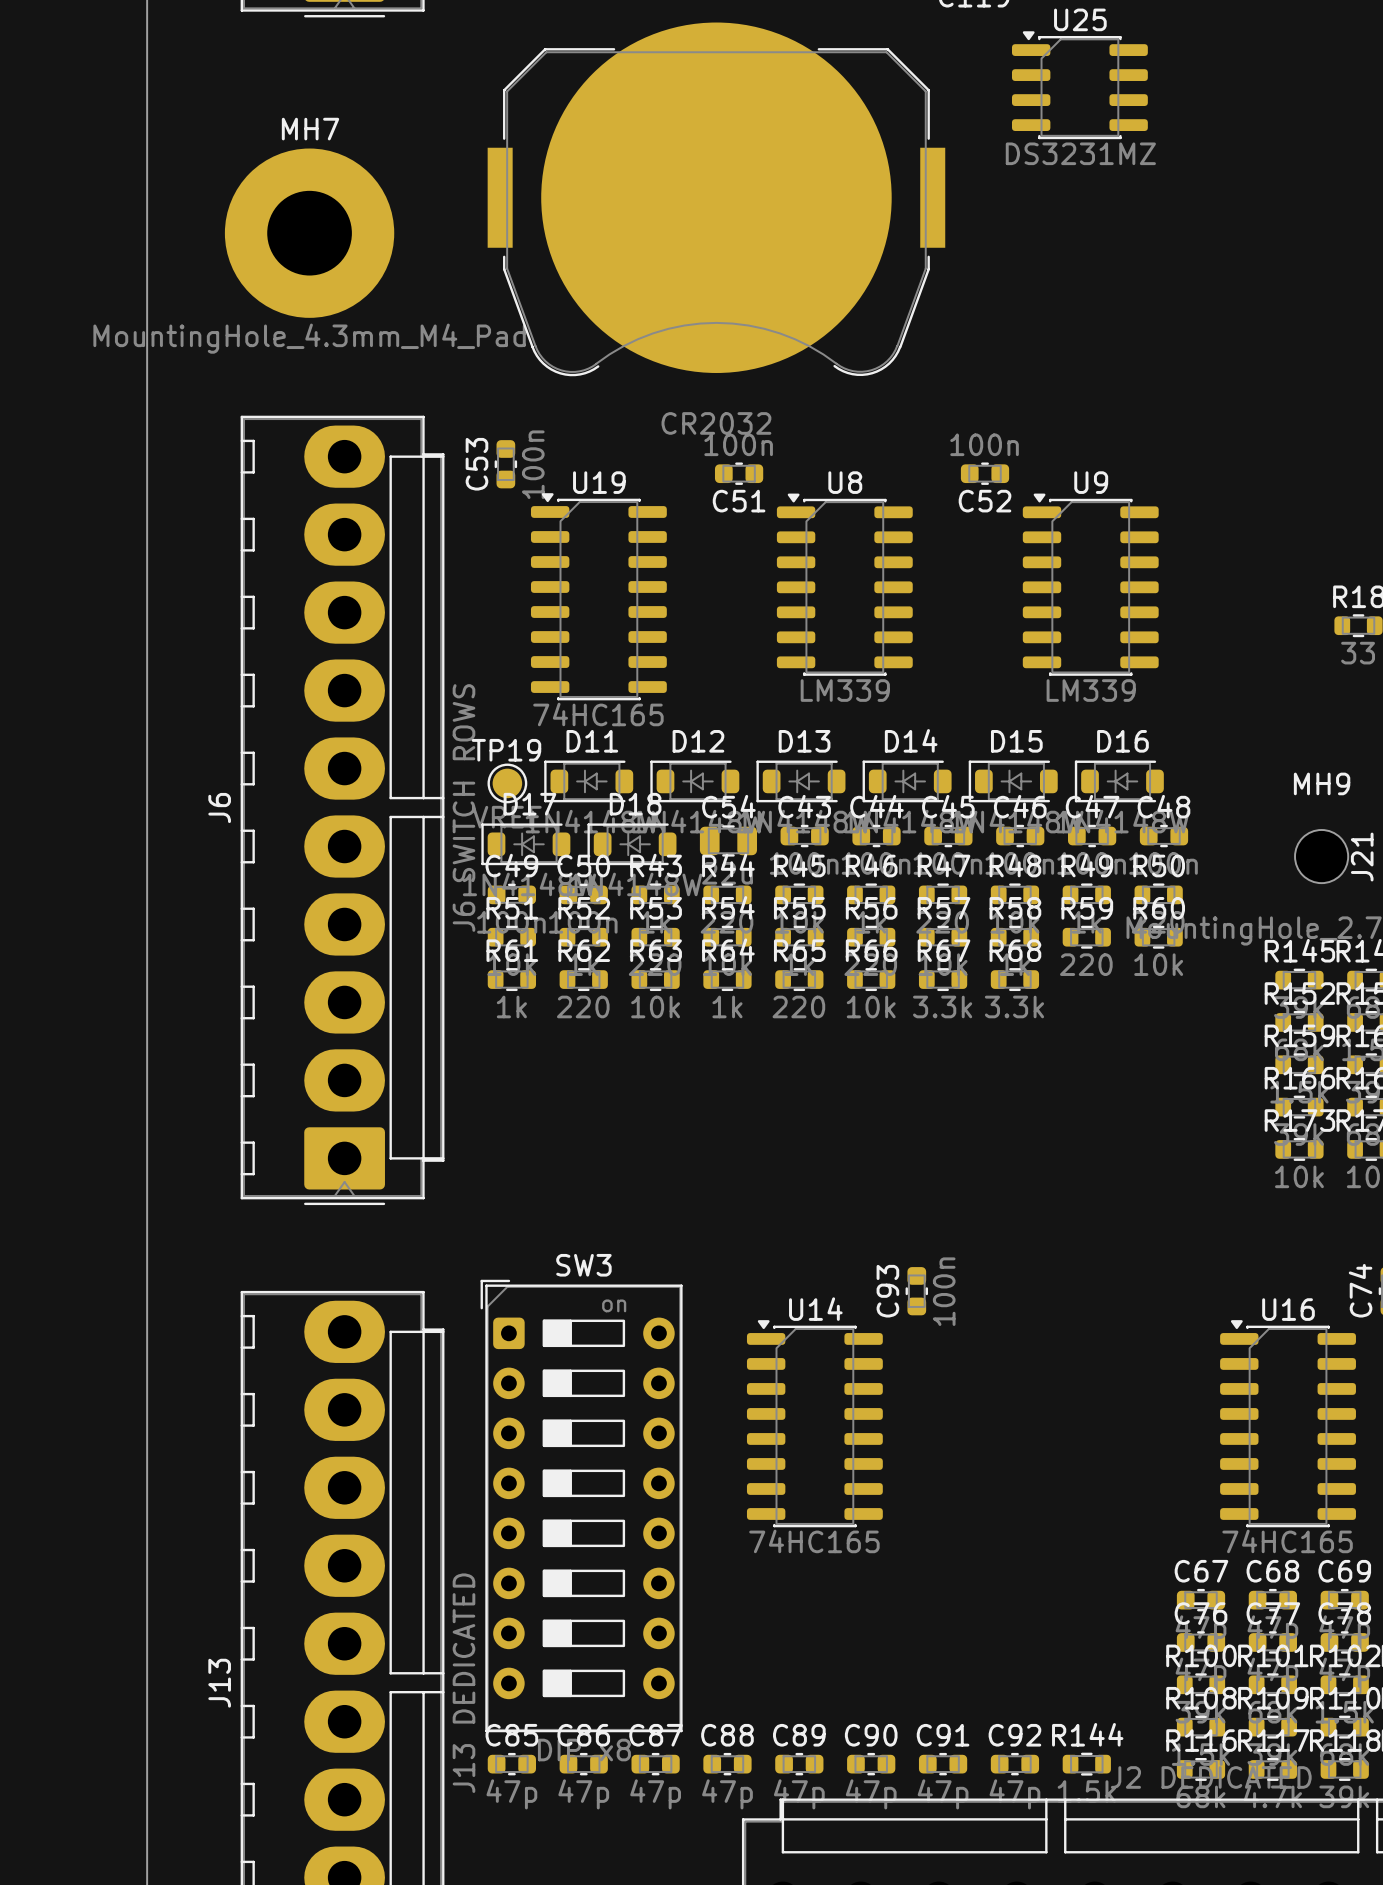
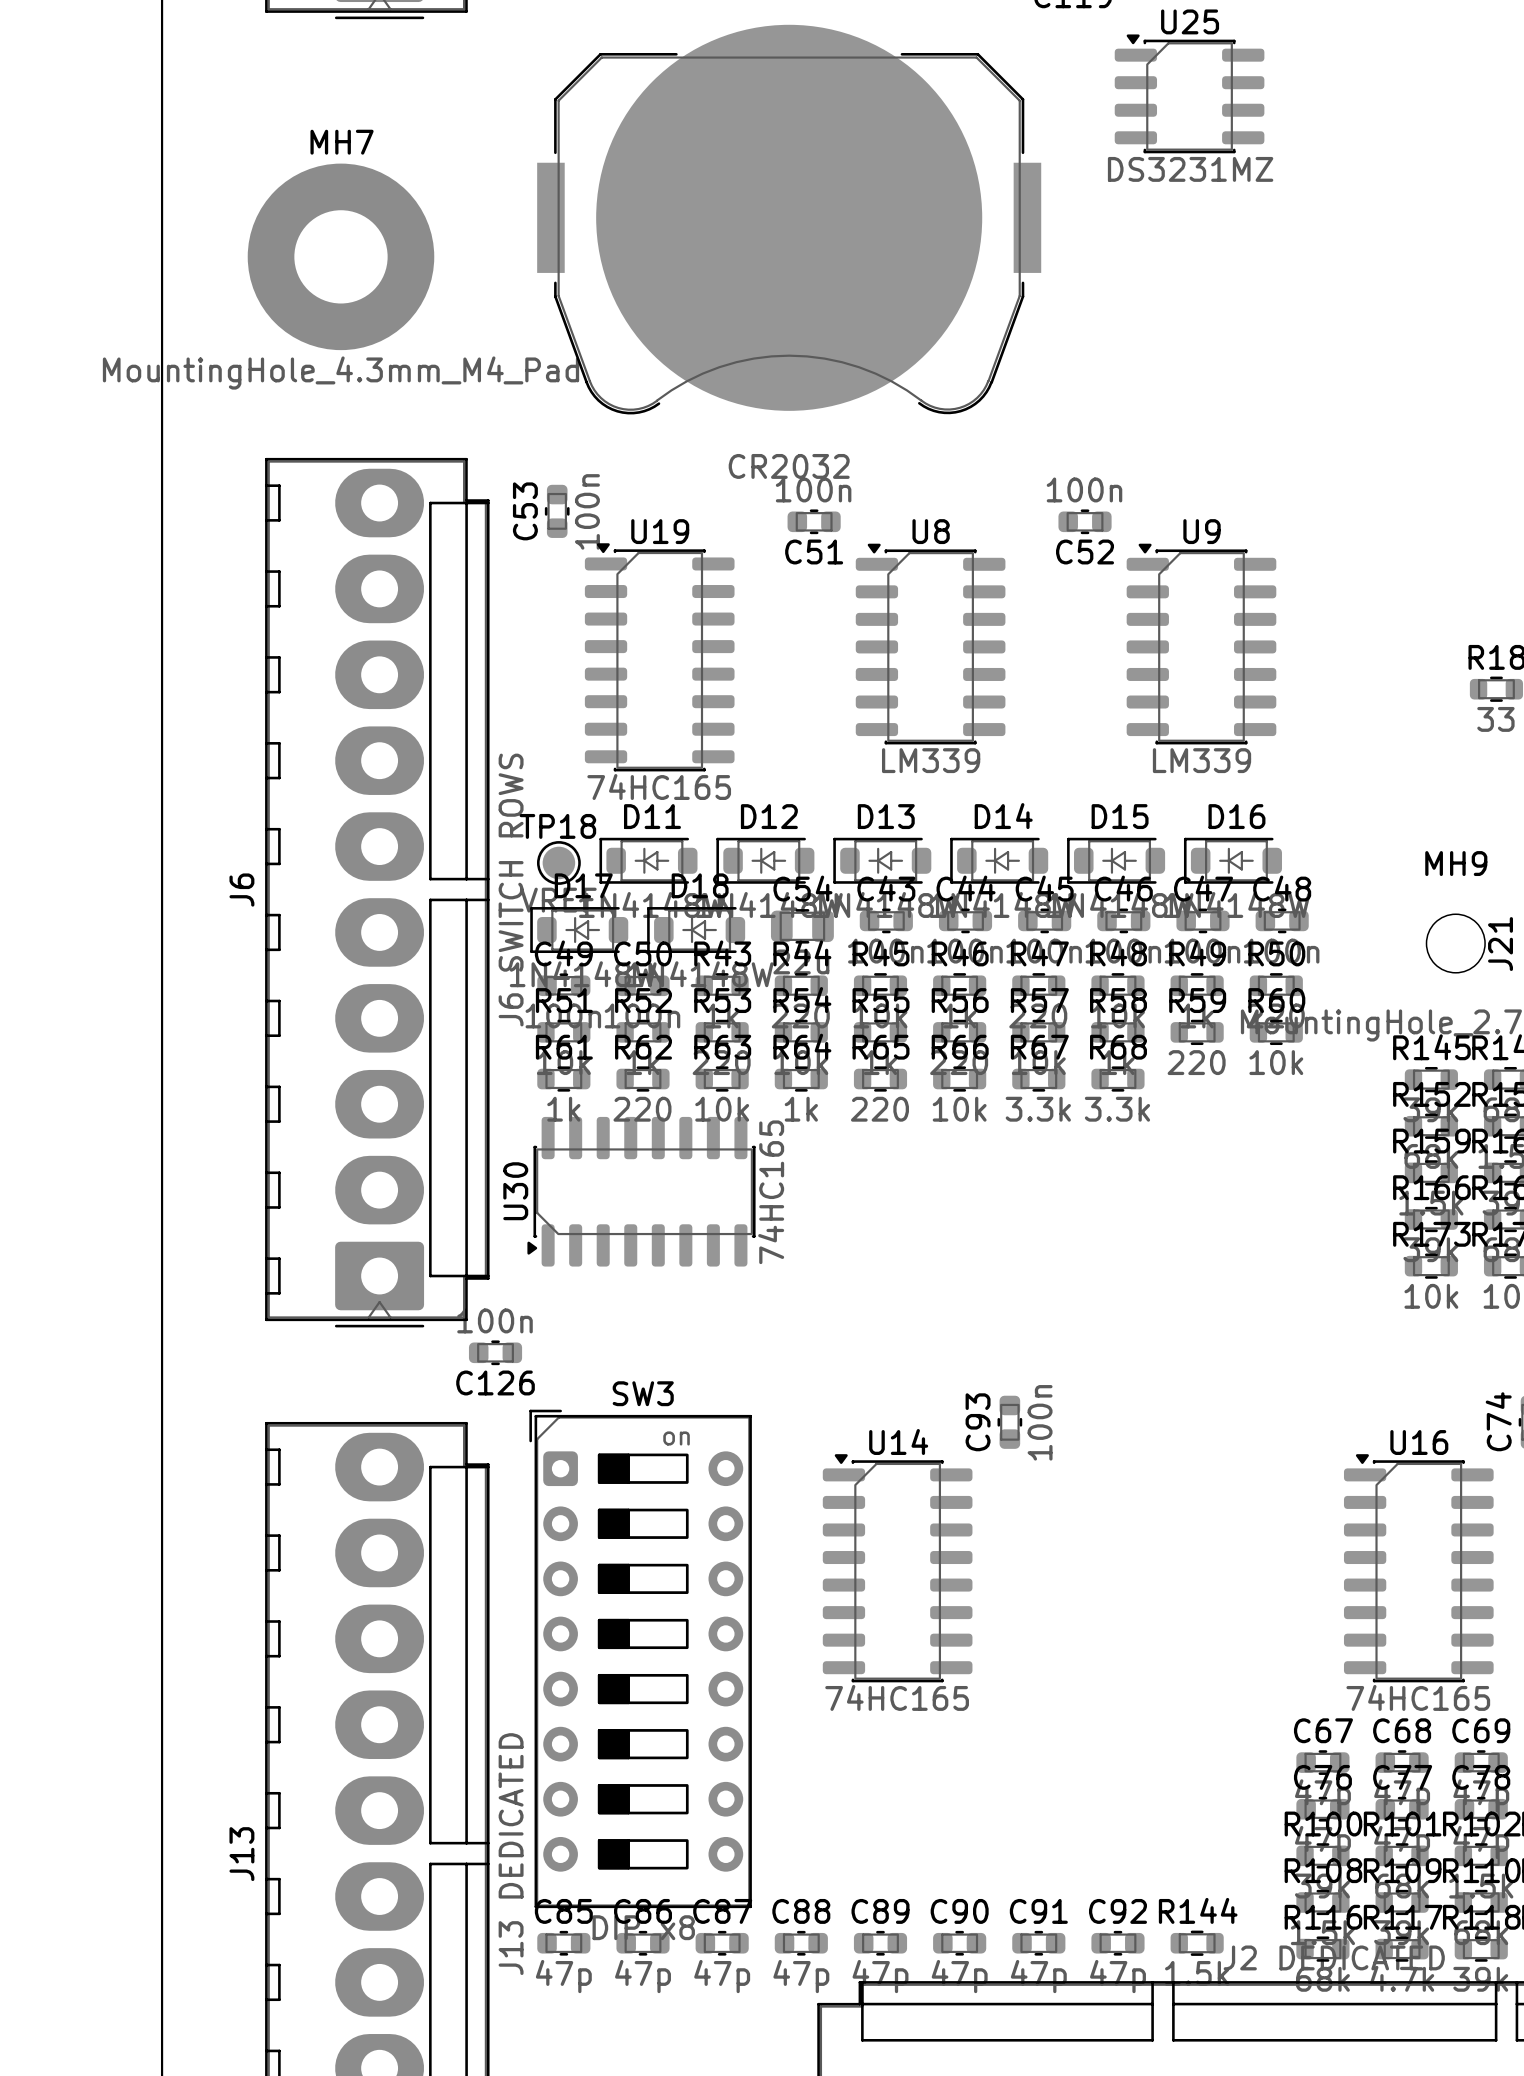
TP19 name: TP19 (506, 750) -> TP18 (557, 826)
U30: none -> 74HC165 (641, 1191)
C126: none -> 100n (495, 1352)

